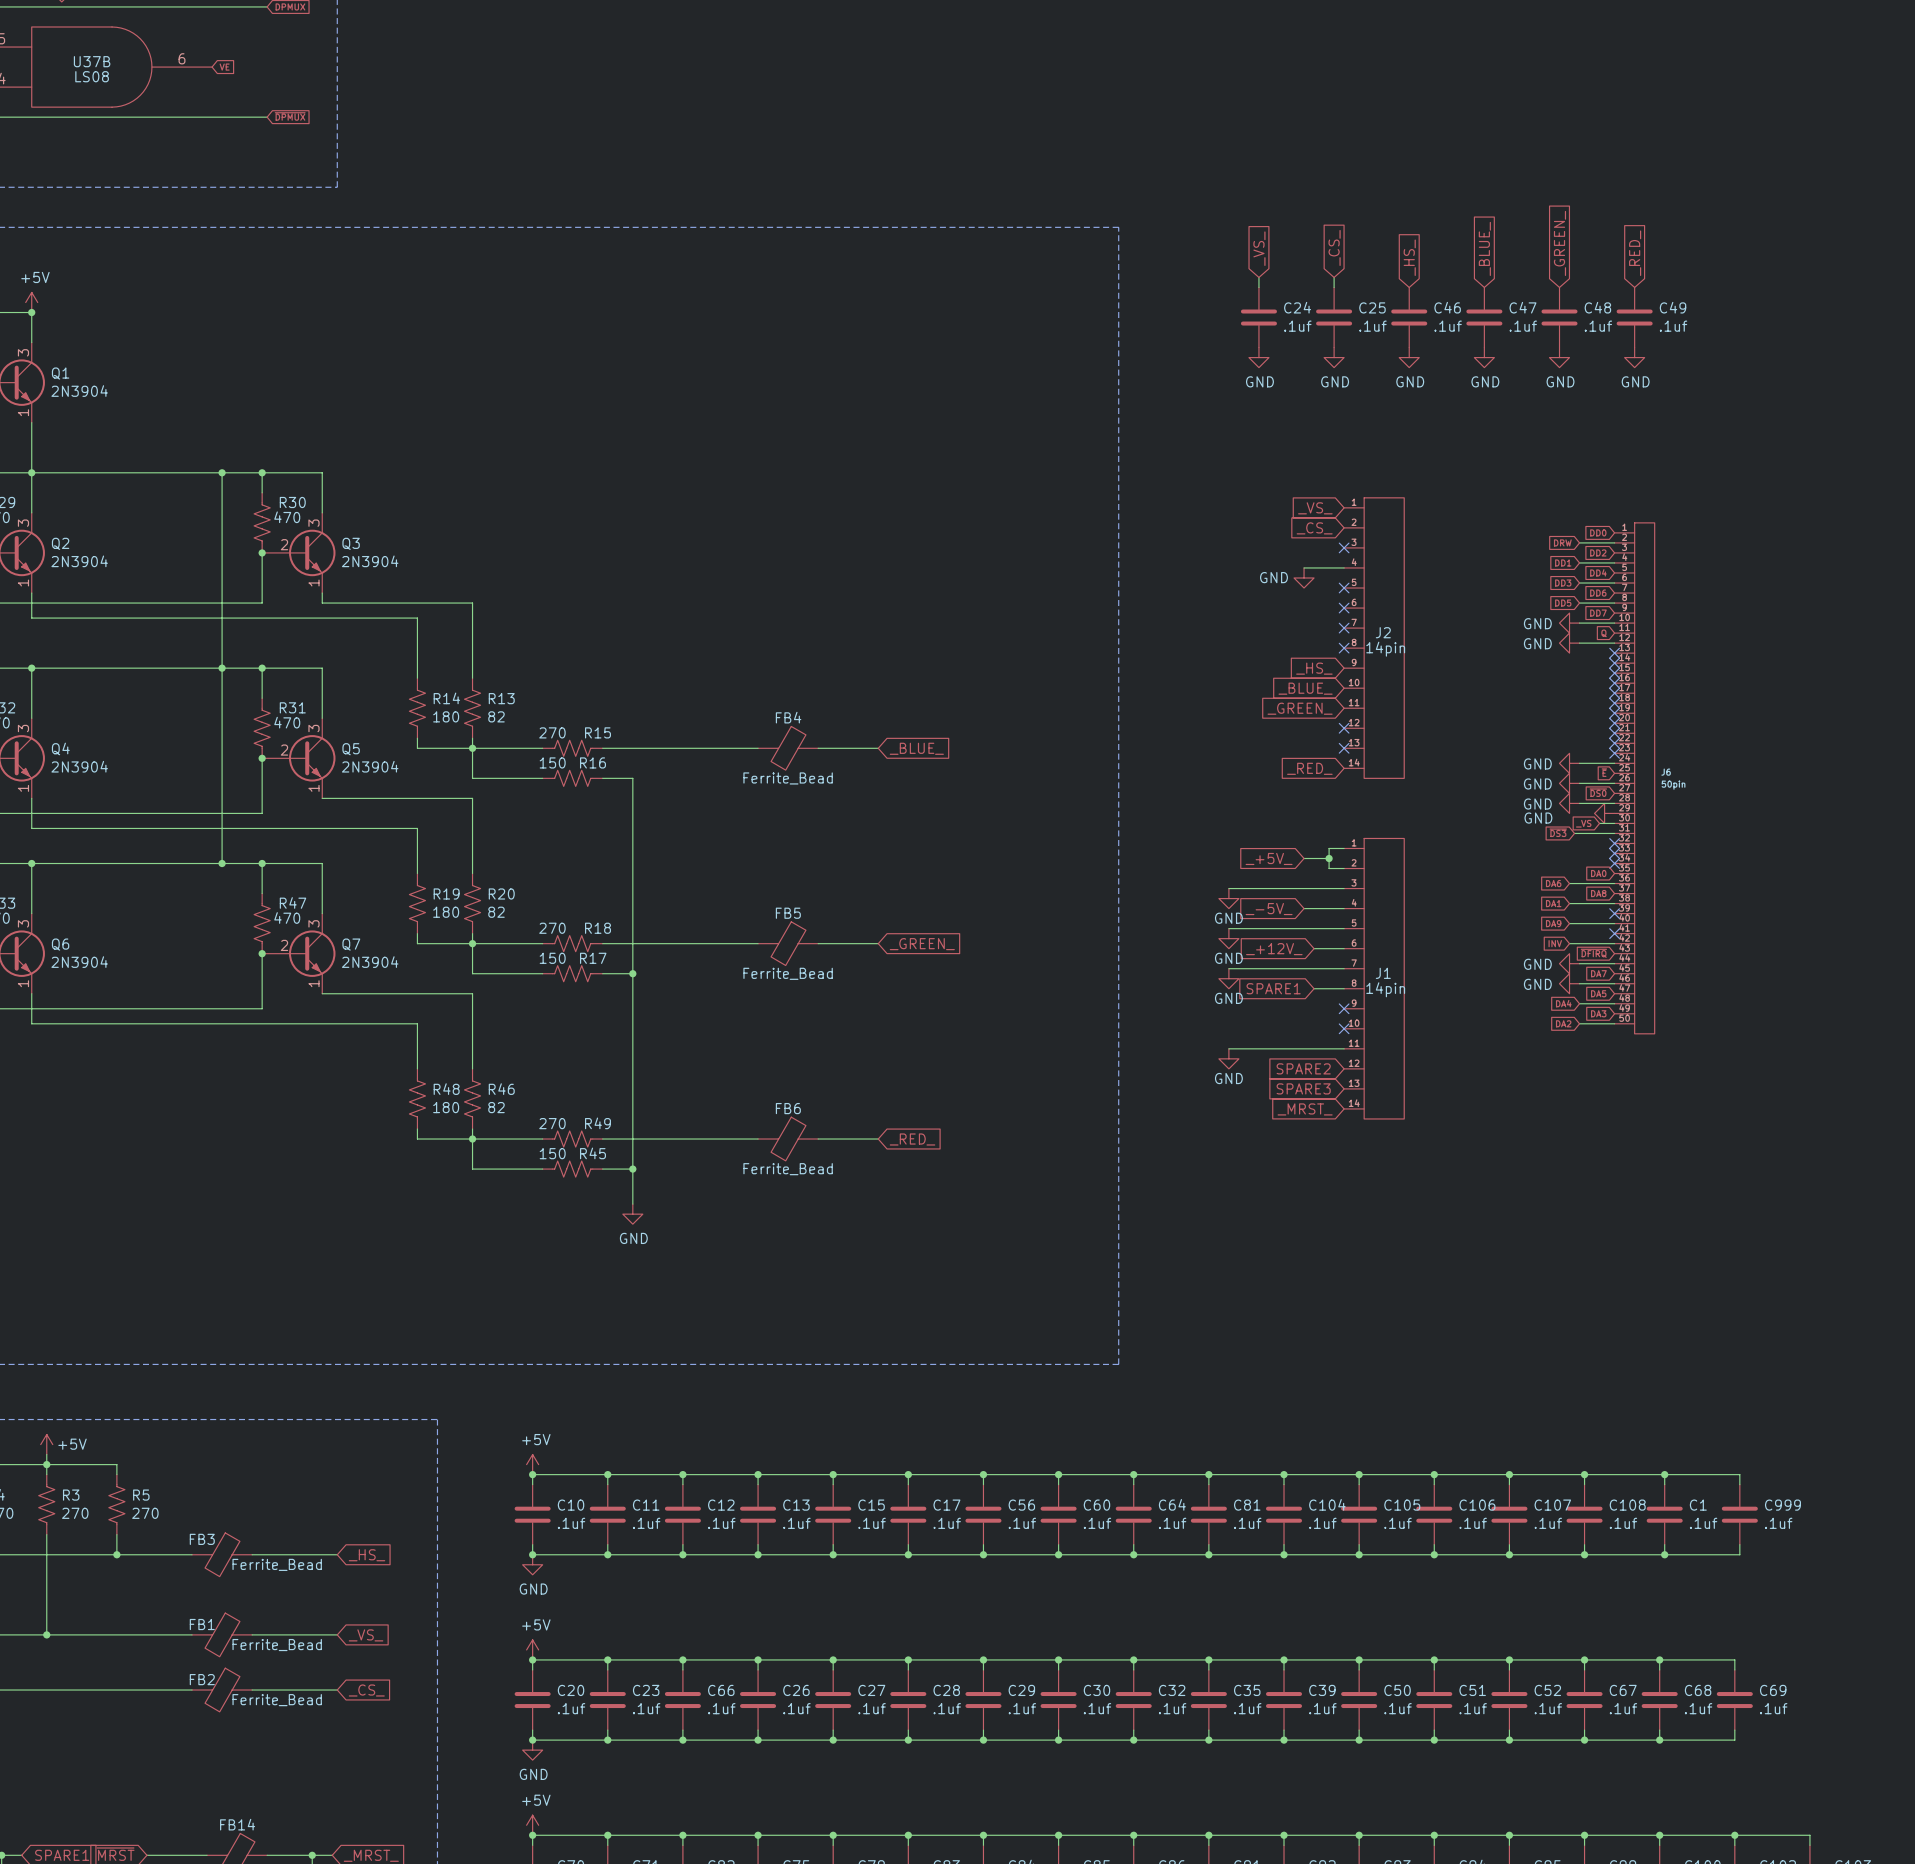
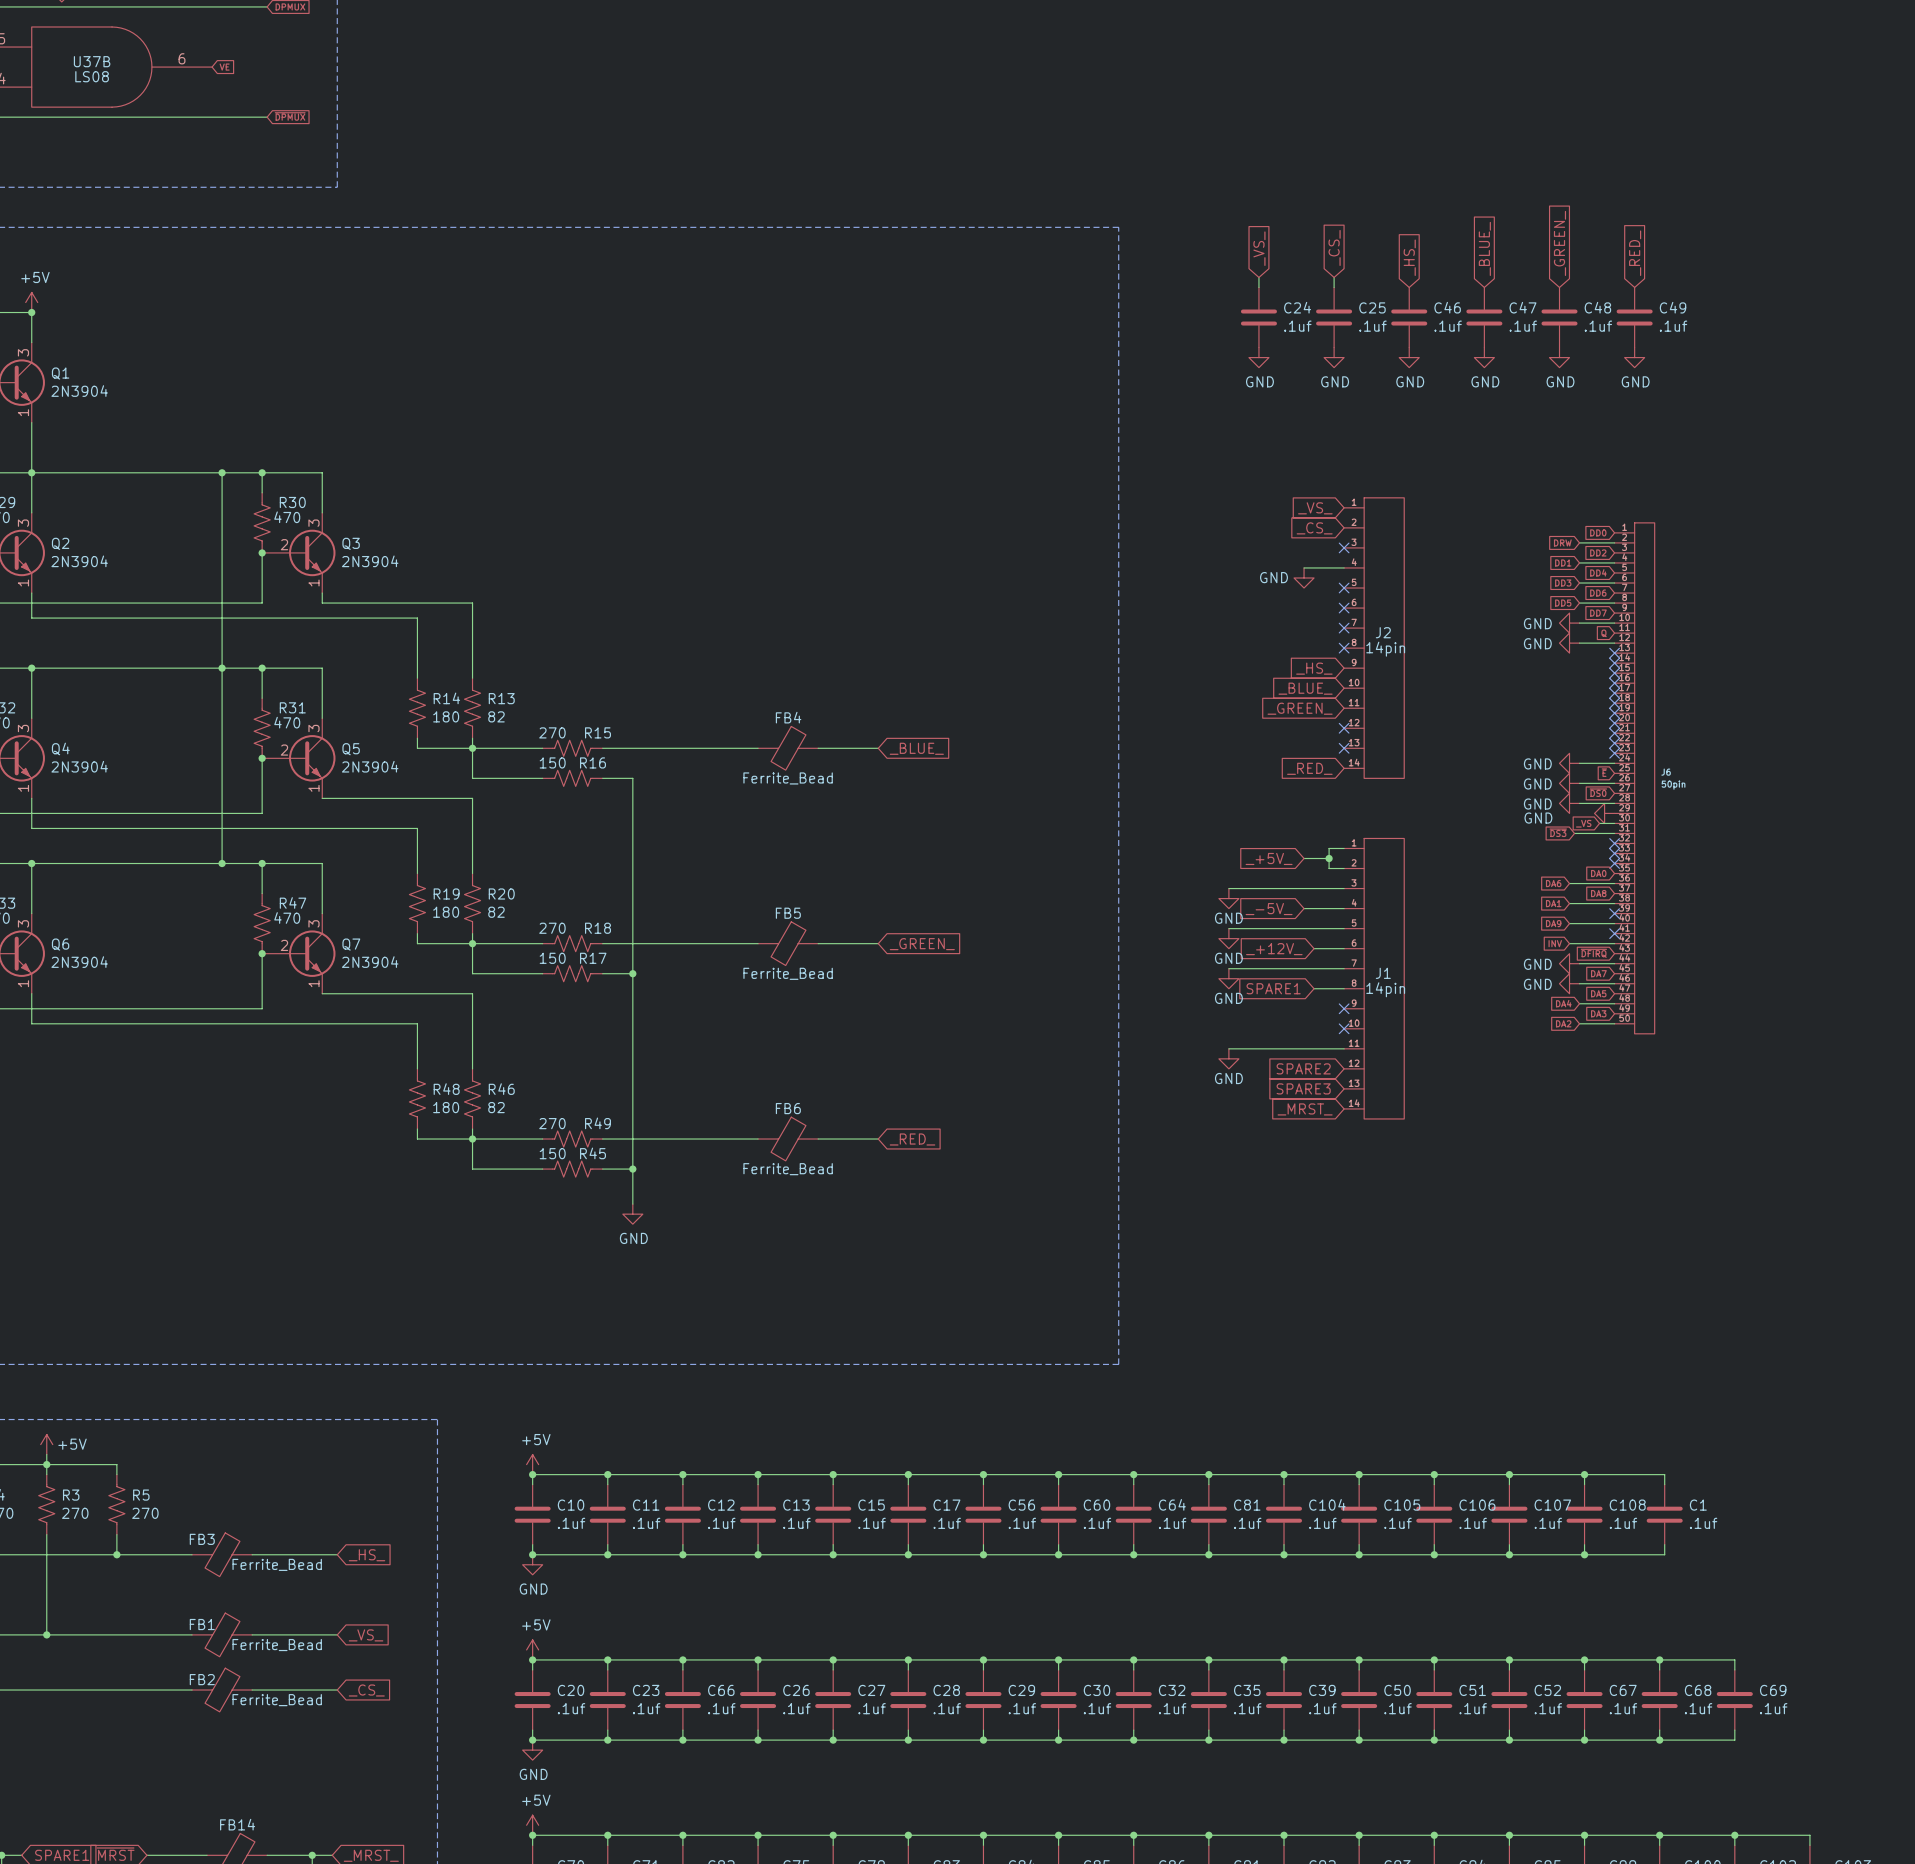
wire: (1664, 1474) (1739, 1474) (1739, 1484) -> none
junction: (1664, 1474) -> none
C999: .1uf (1739, 1514) -> none
wire: (1739, 1544) (1739, 1554) (1664, 1554) -> none
junction: (1664, 1554) -> none

